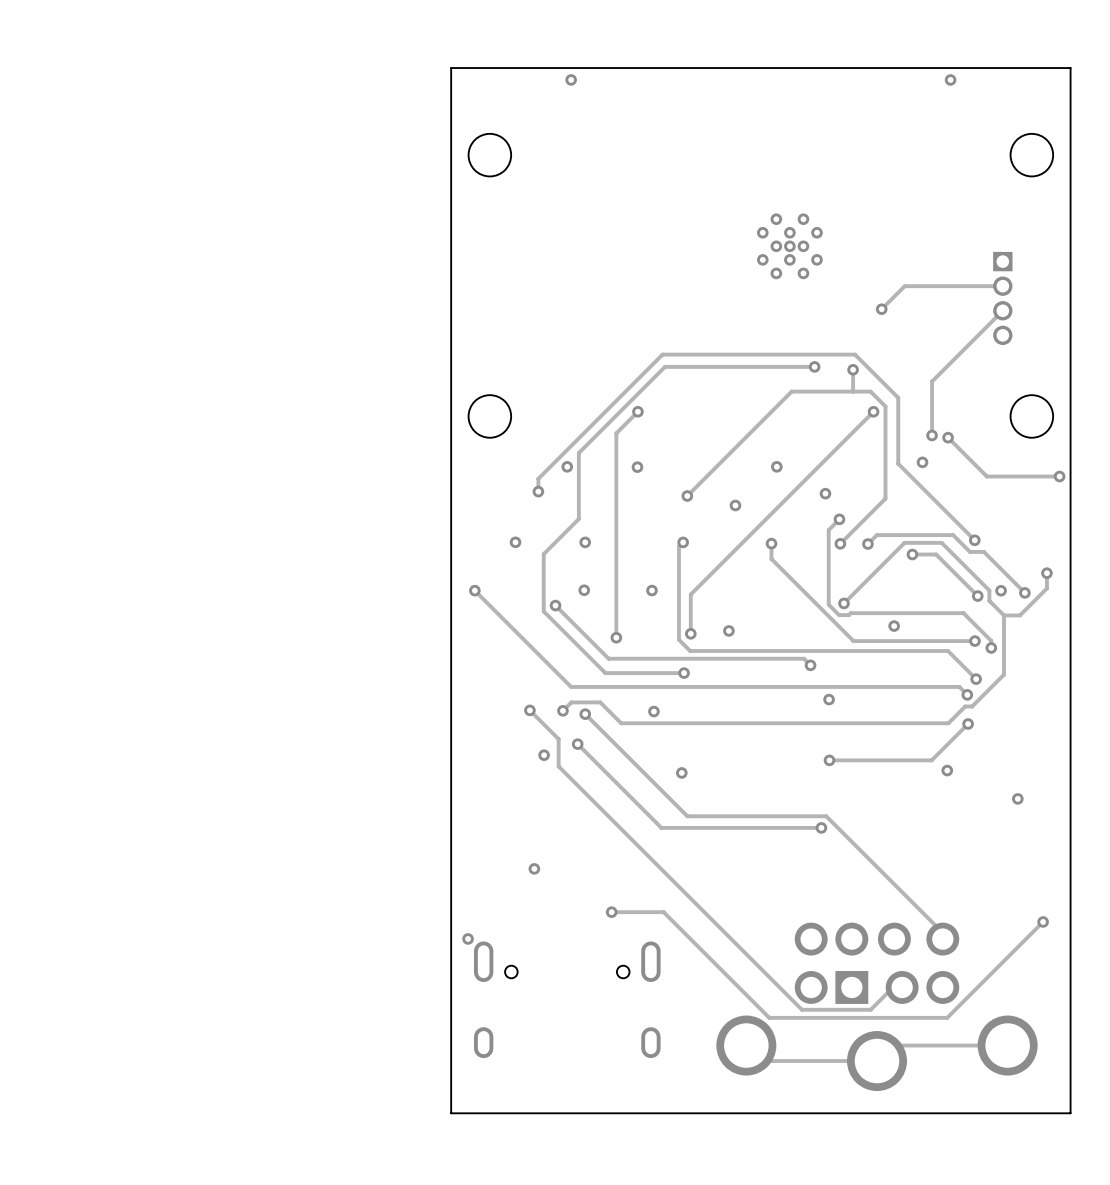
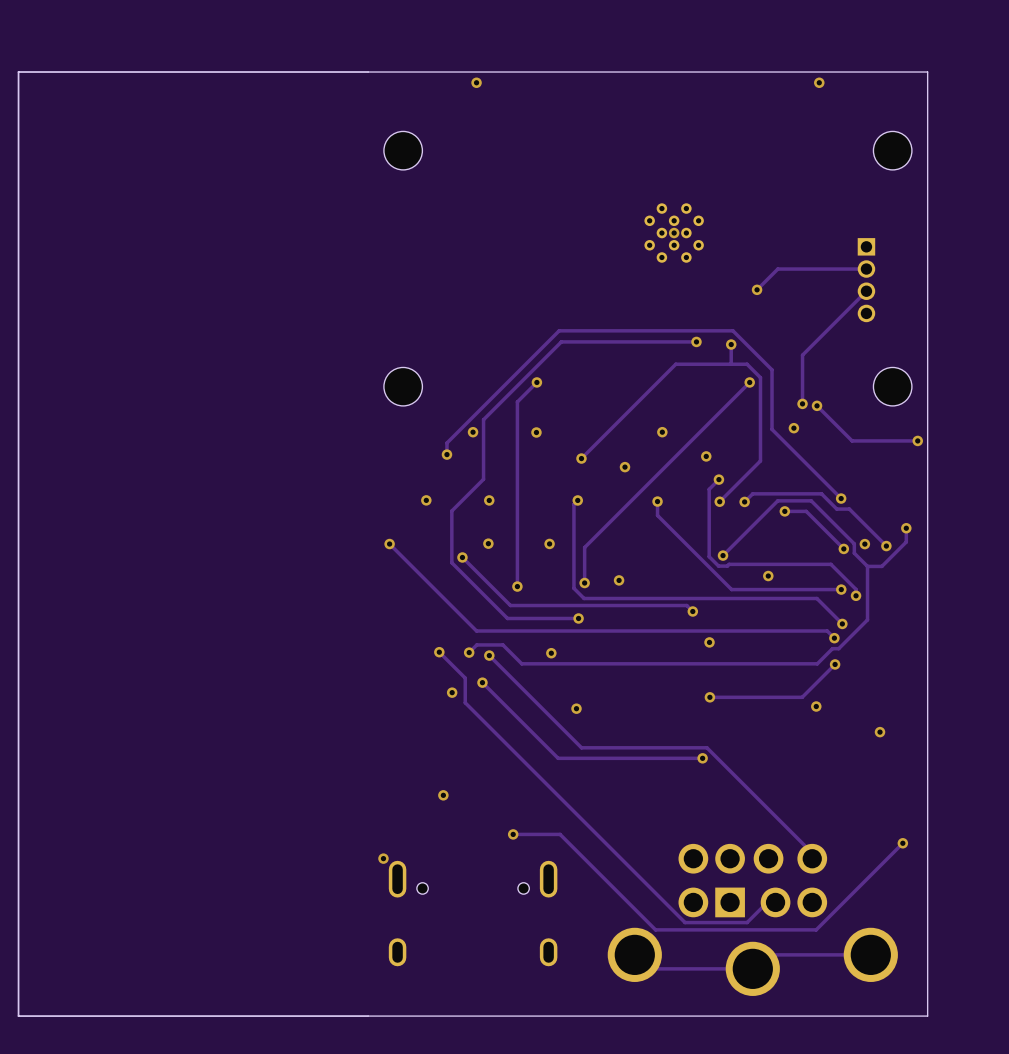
board edge: (451, 68) (451, 1113) -> (368, 72) (18, 72) (18, 1016) (368, 1016)

